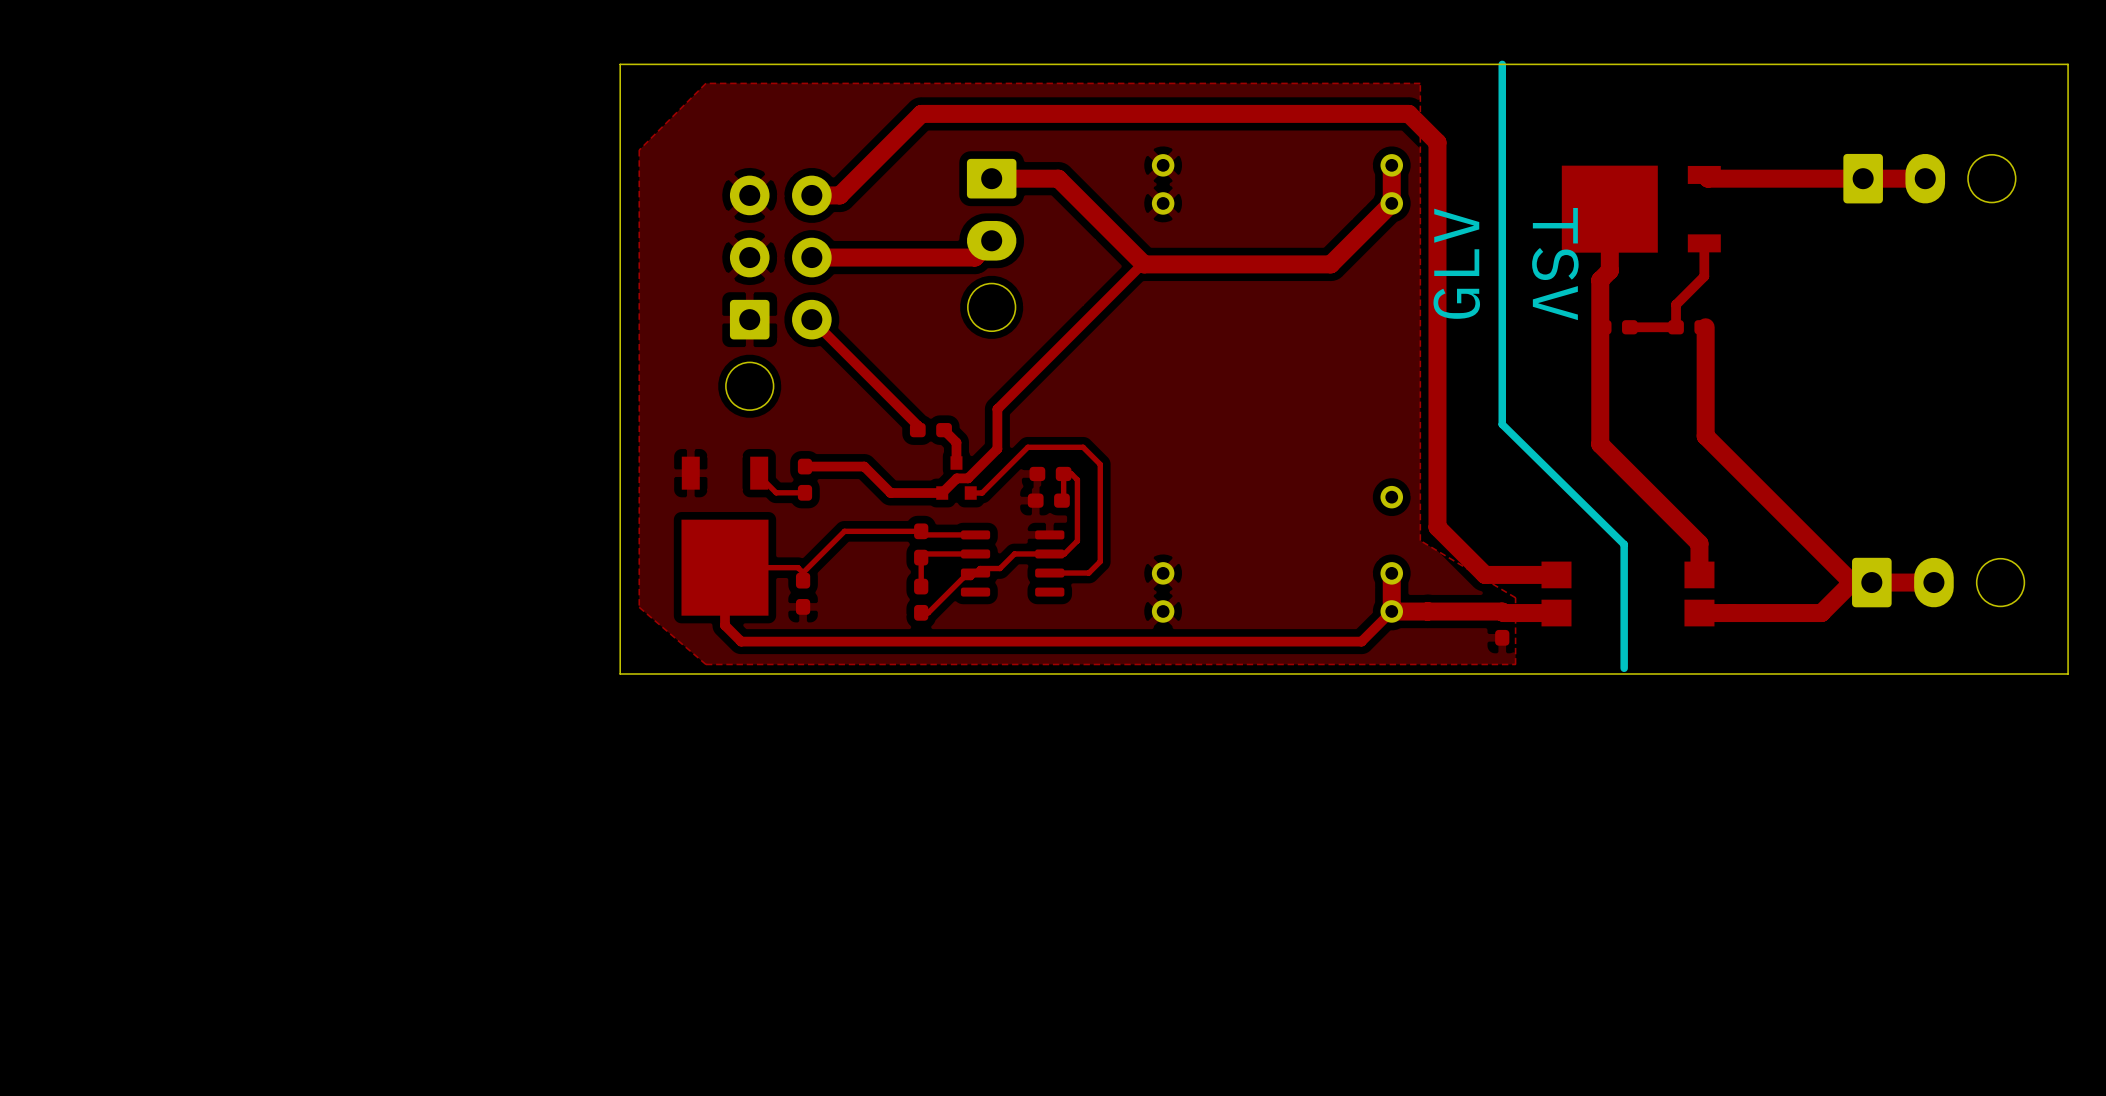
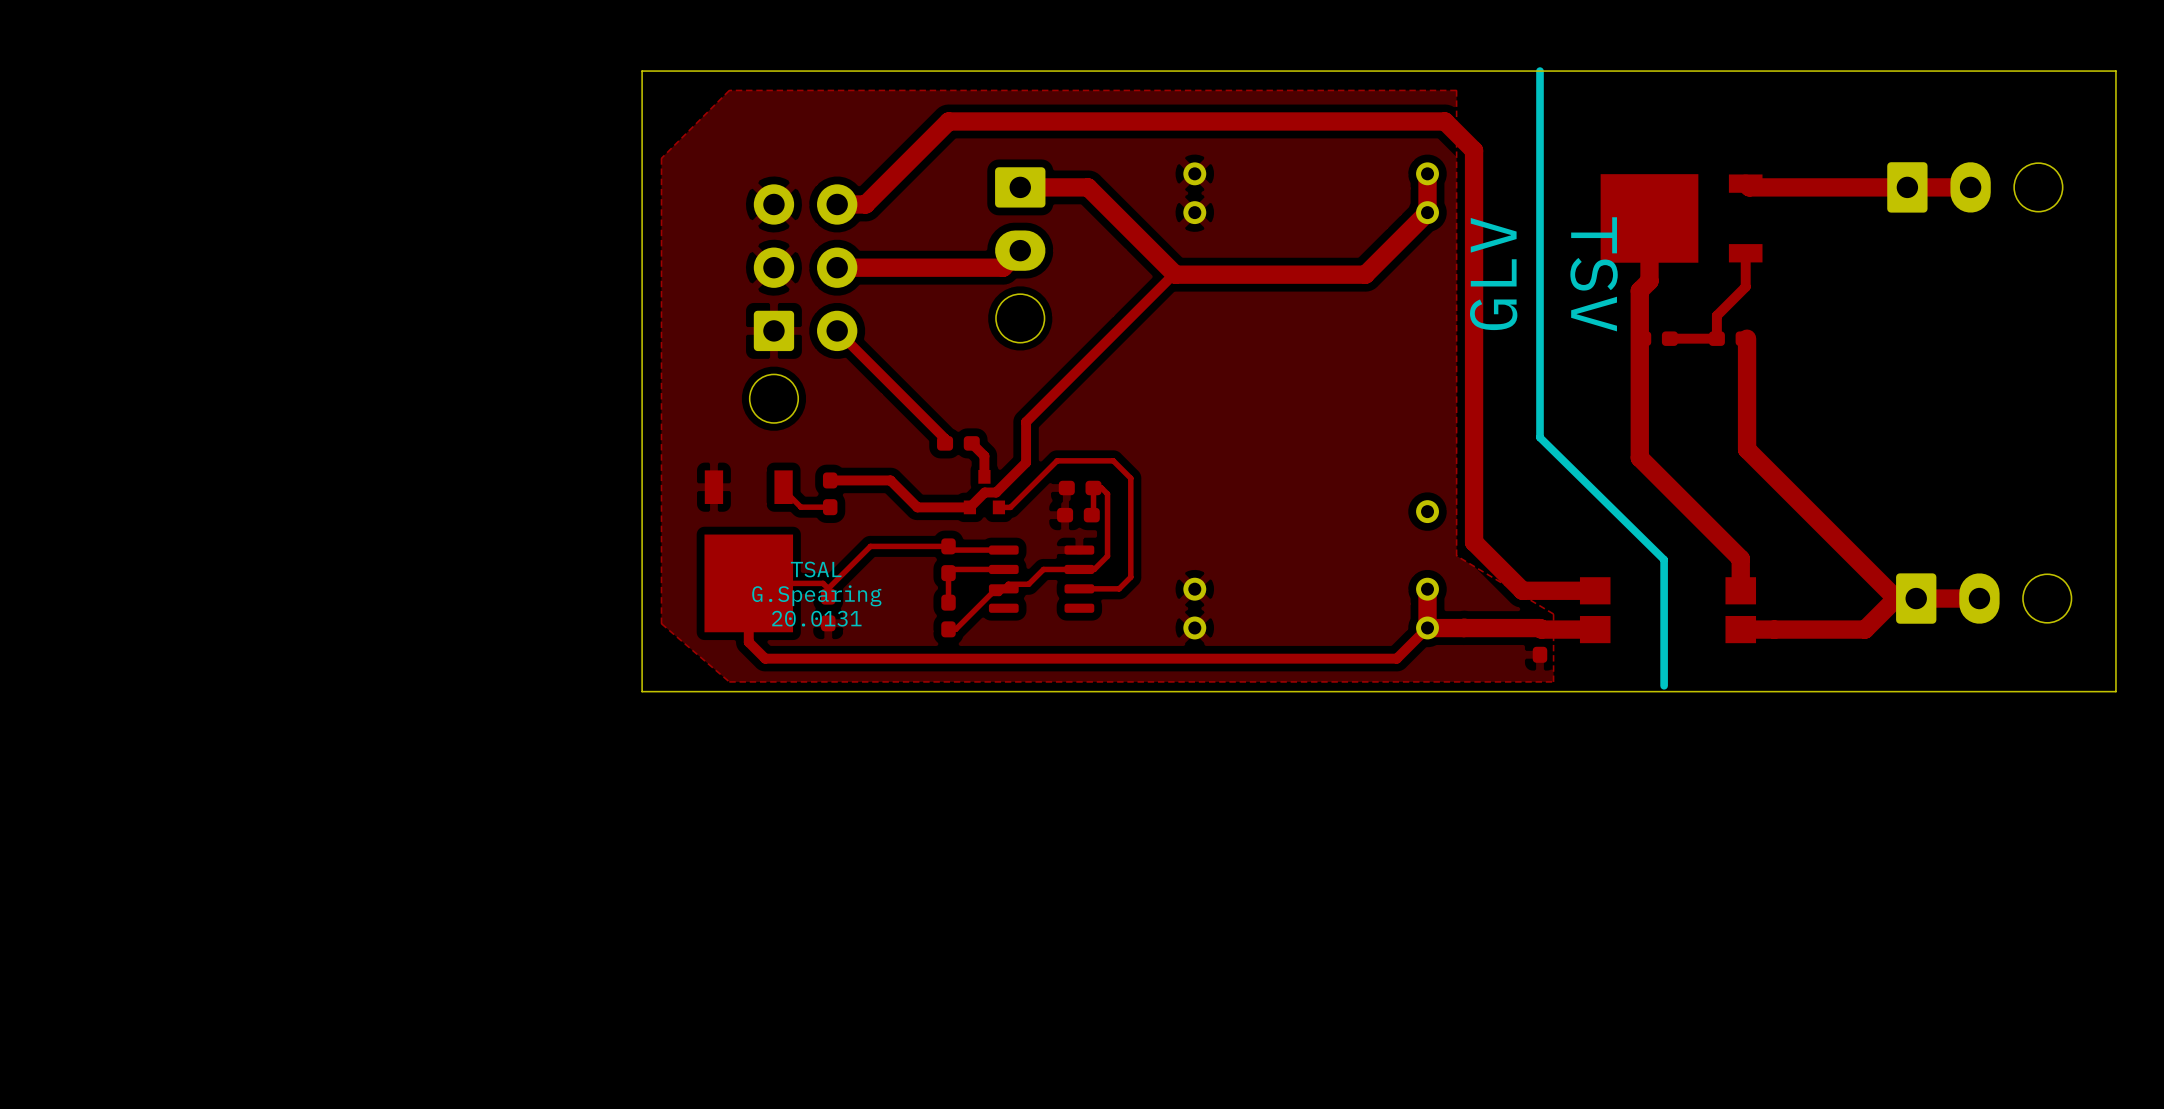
text: none -> TSAL (816, 569)
text: none -> G.Spearing (816, 595)
text: none -> 20.0131 (816, 618)

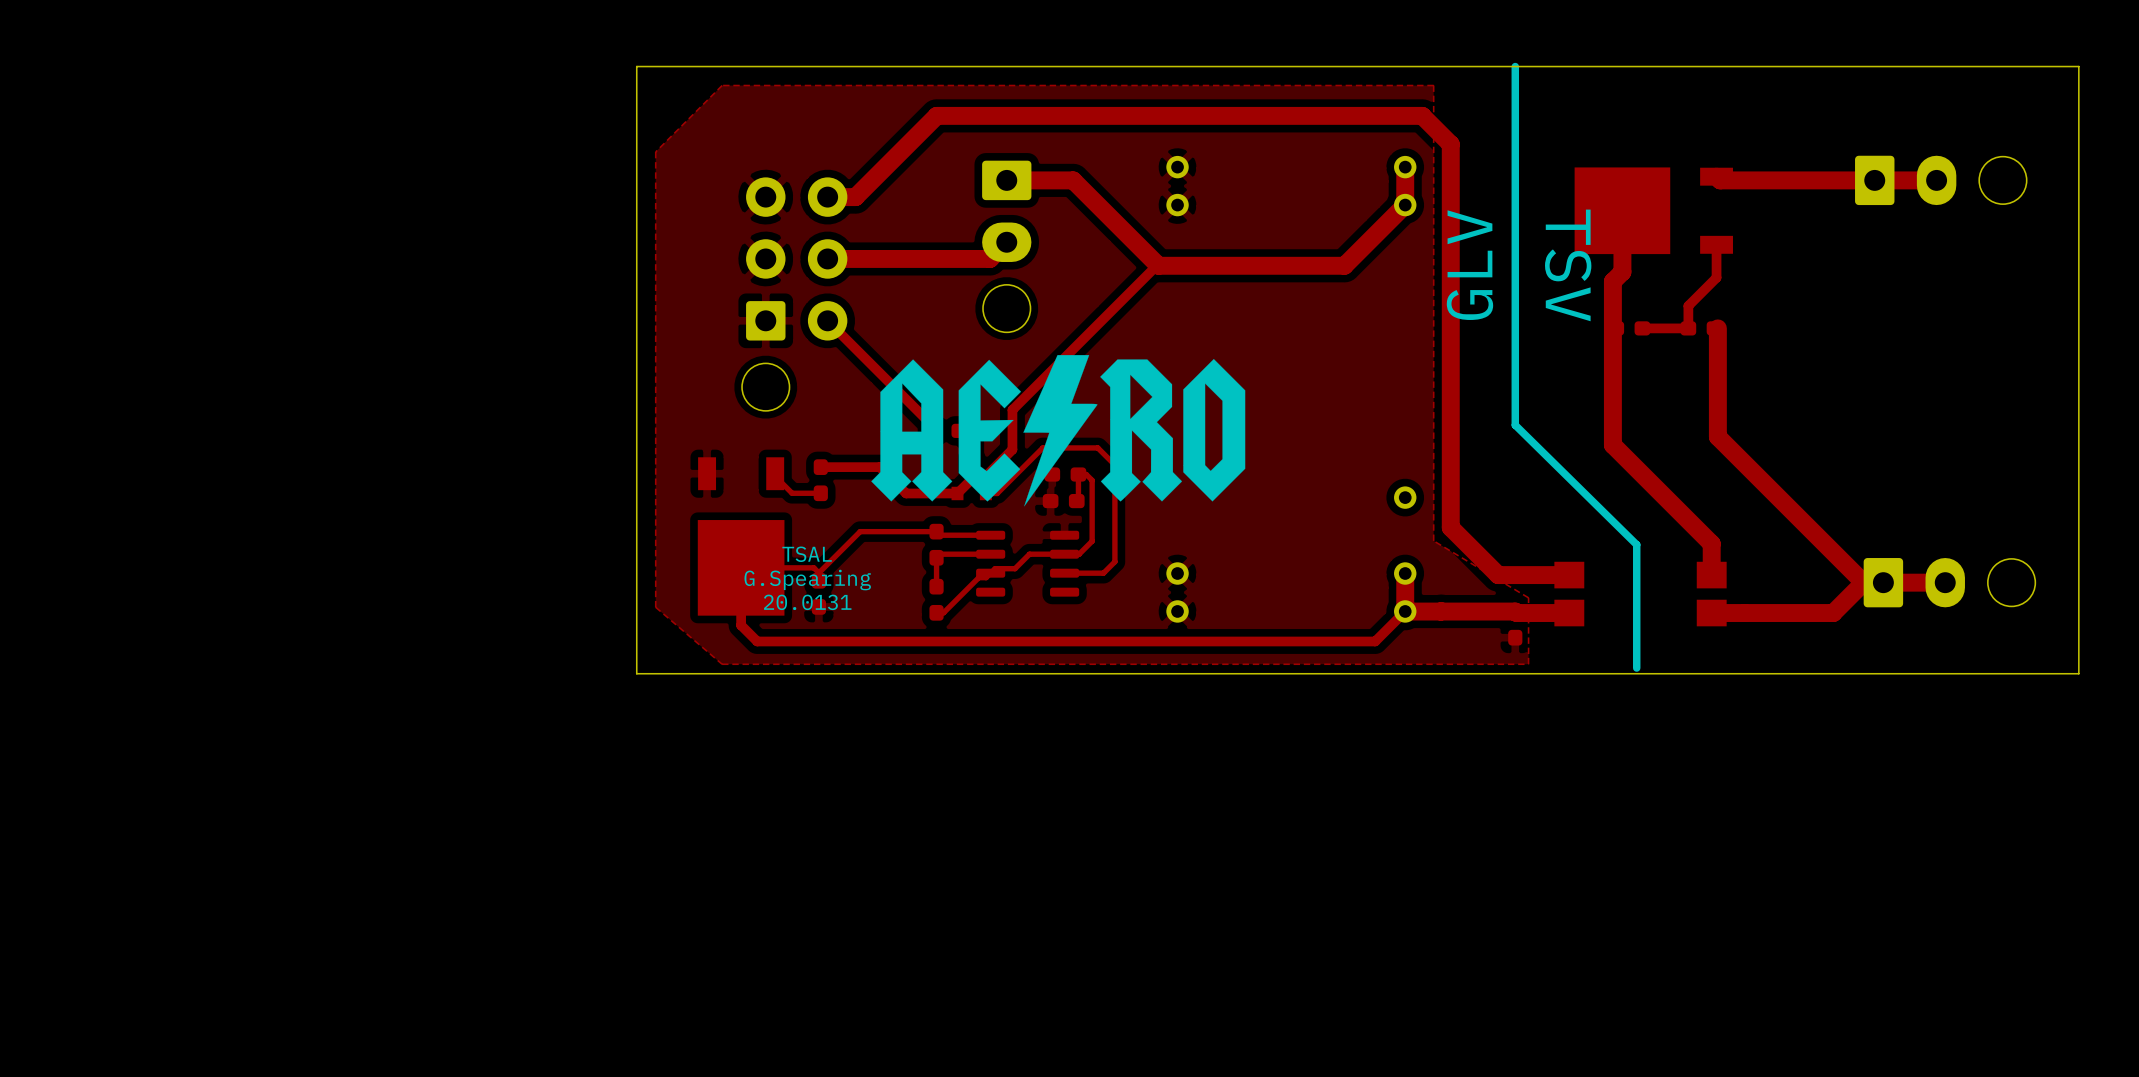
drawing: none -> [871, 355, 1246, 507]

